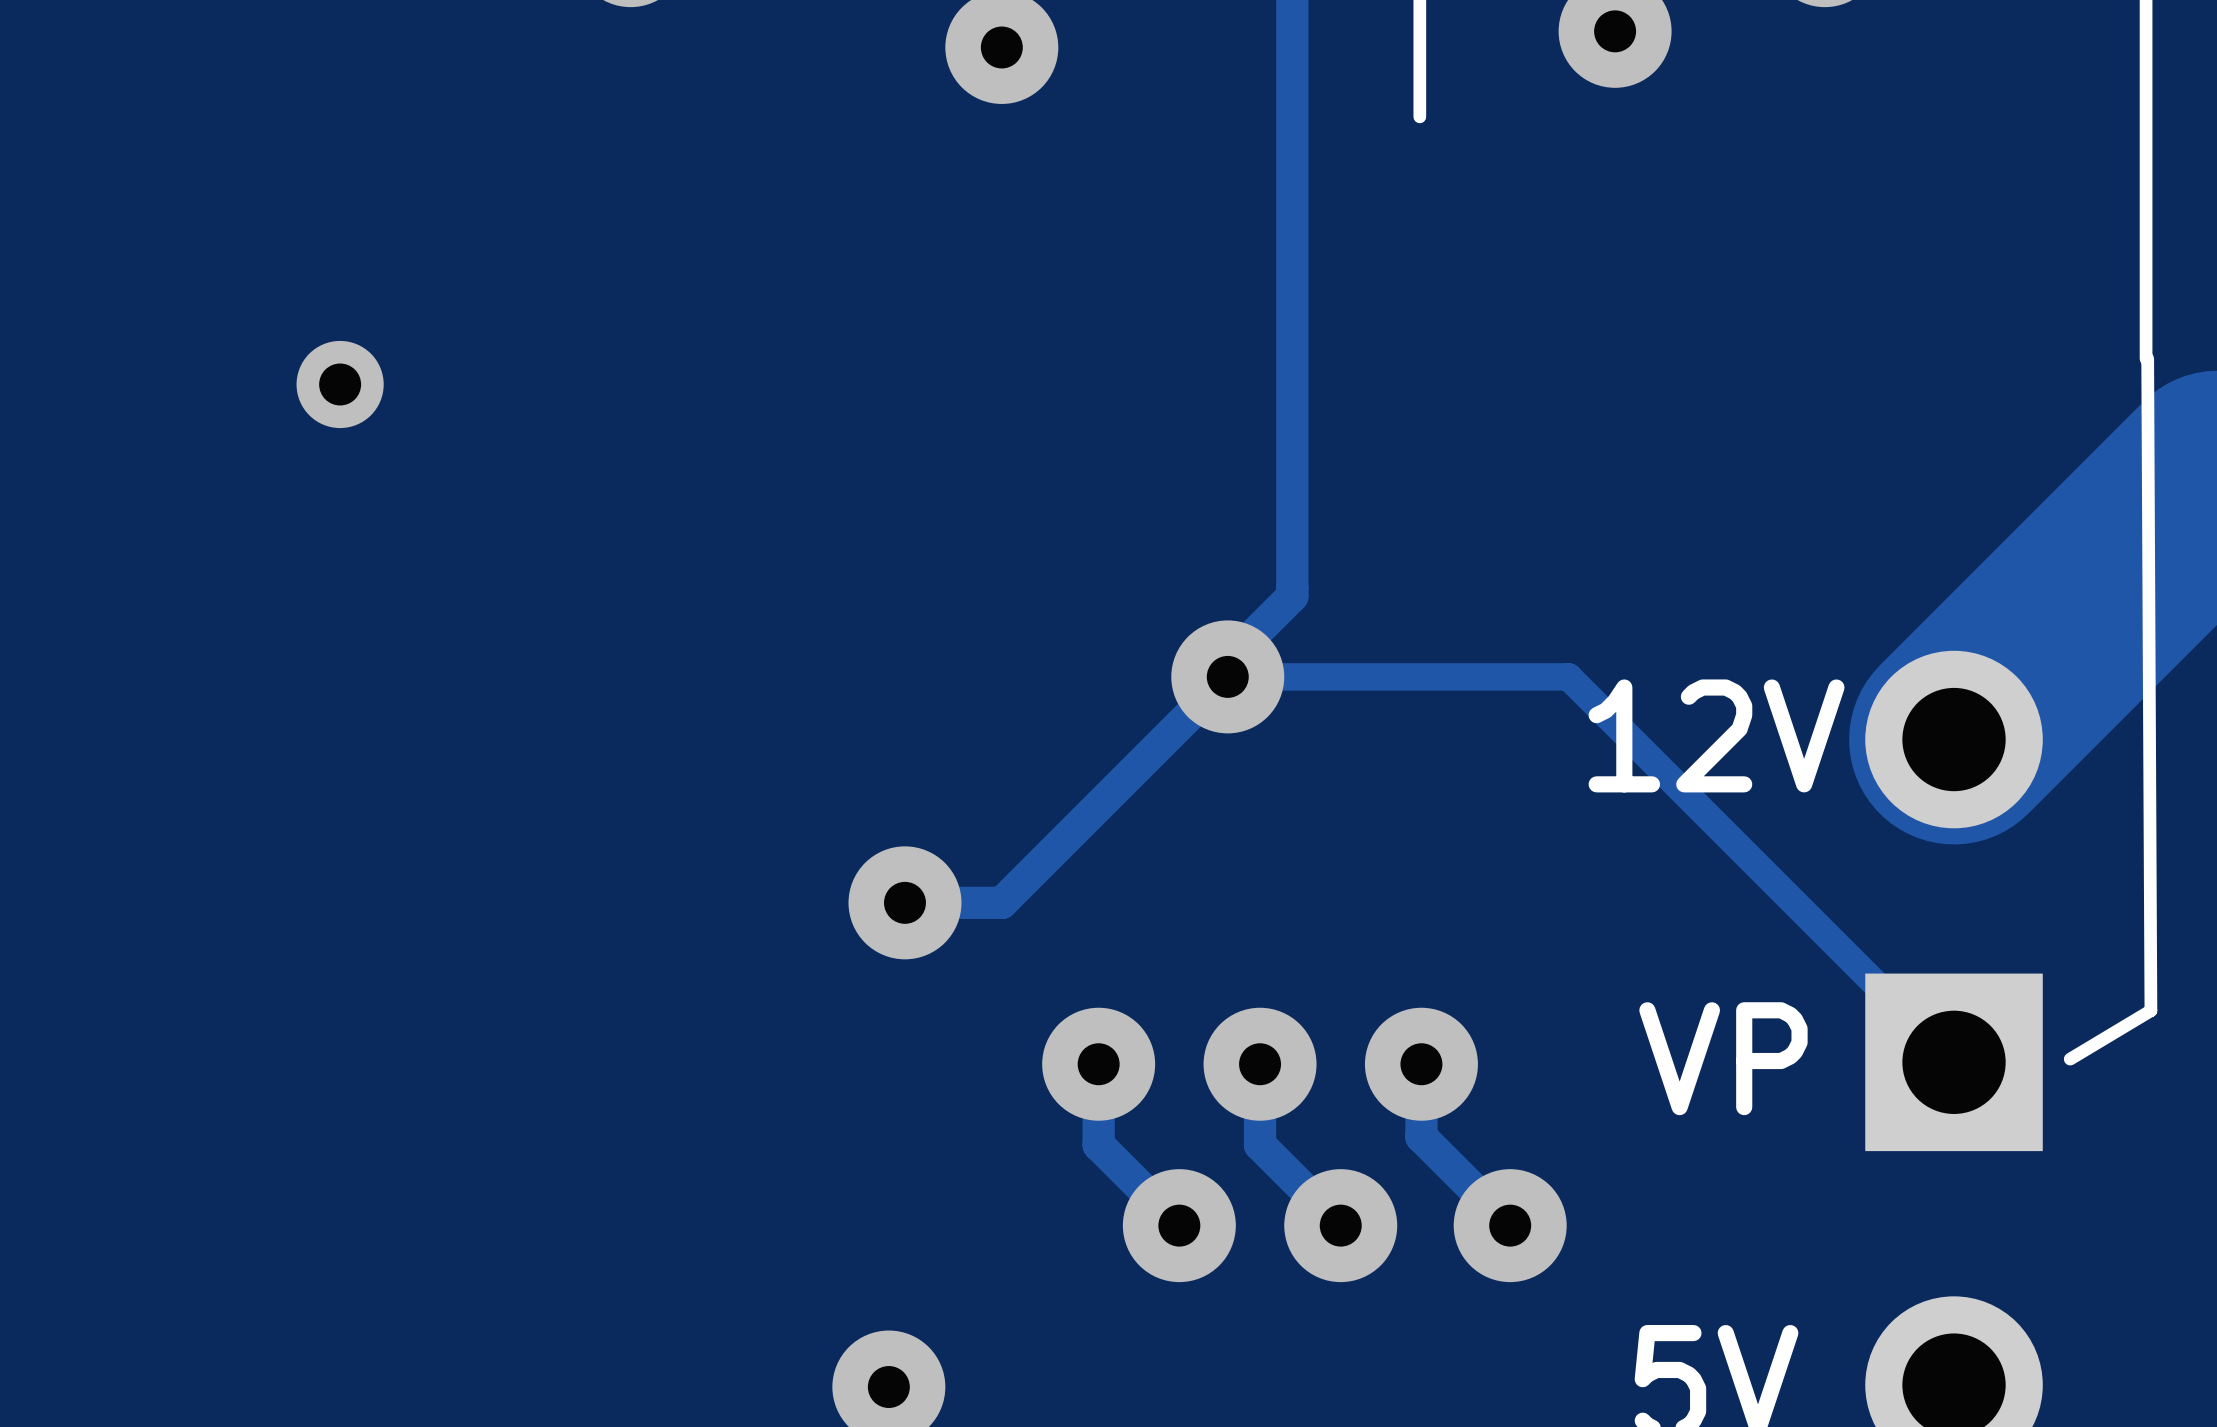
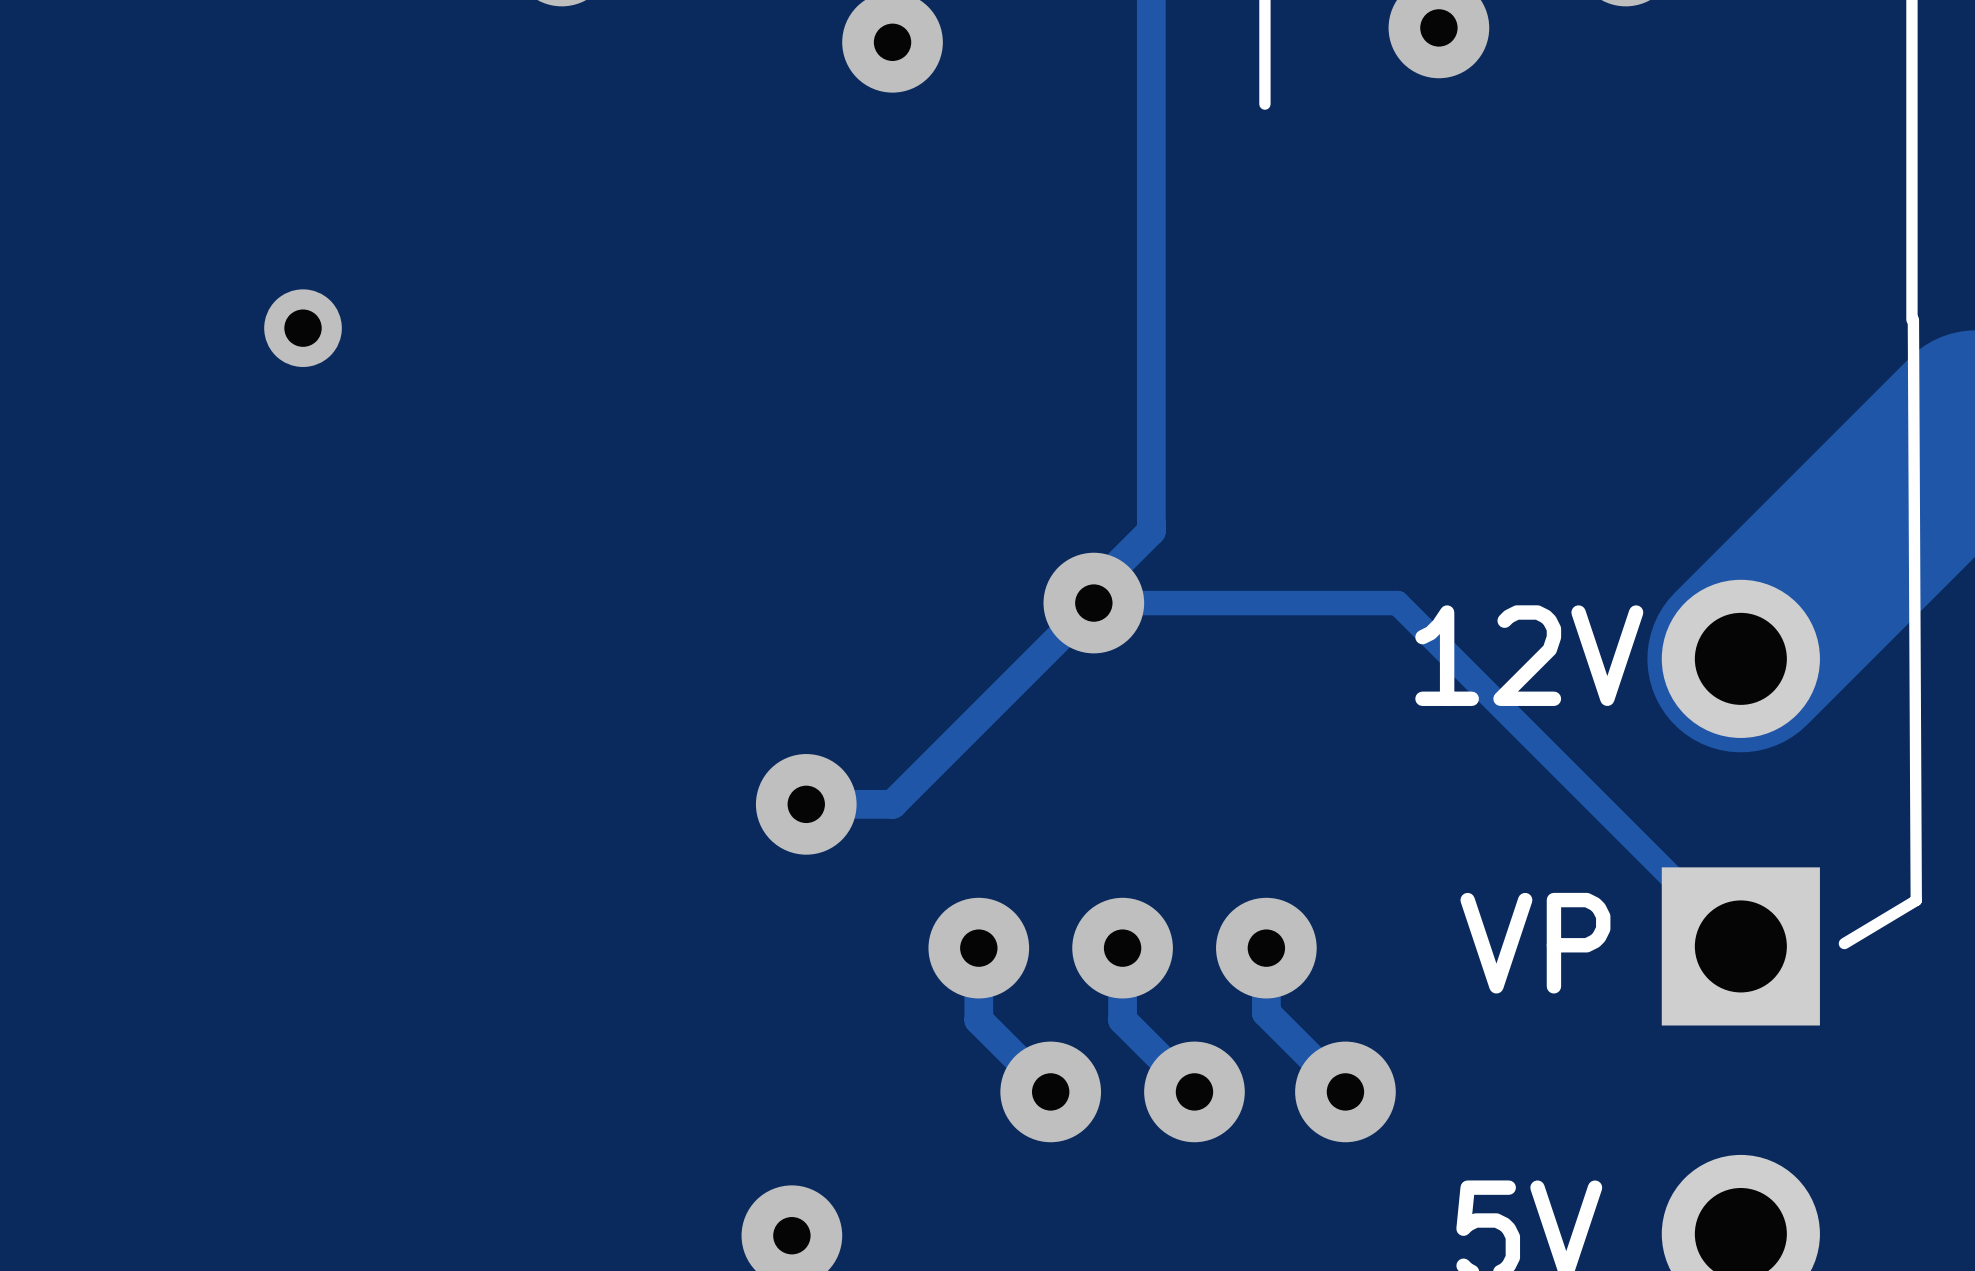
via position: (340, 384) -> (303, 328)

